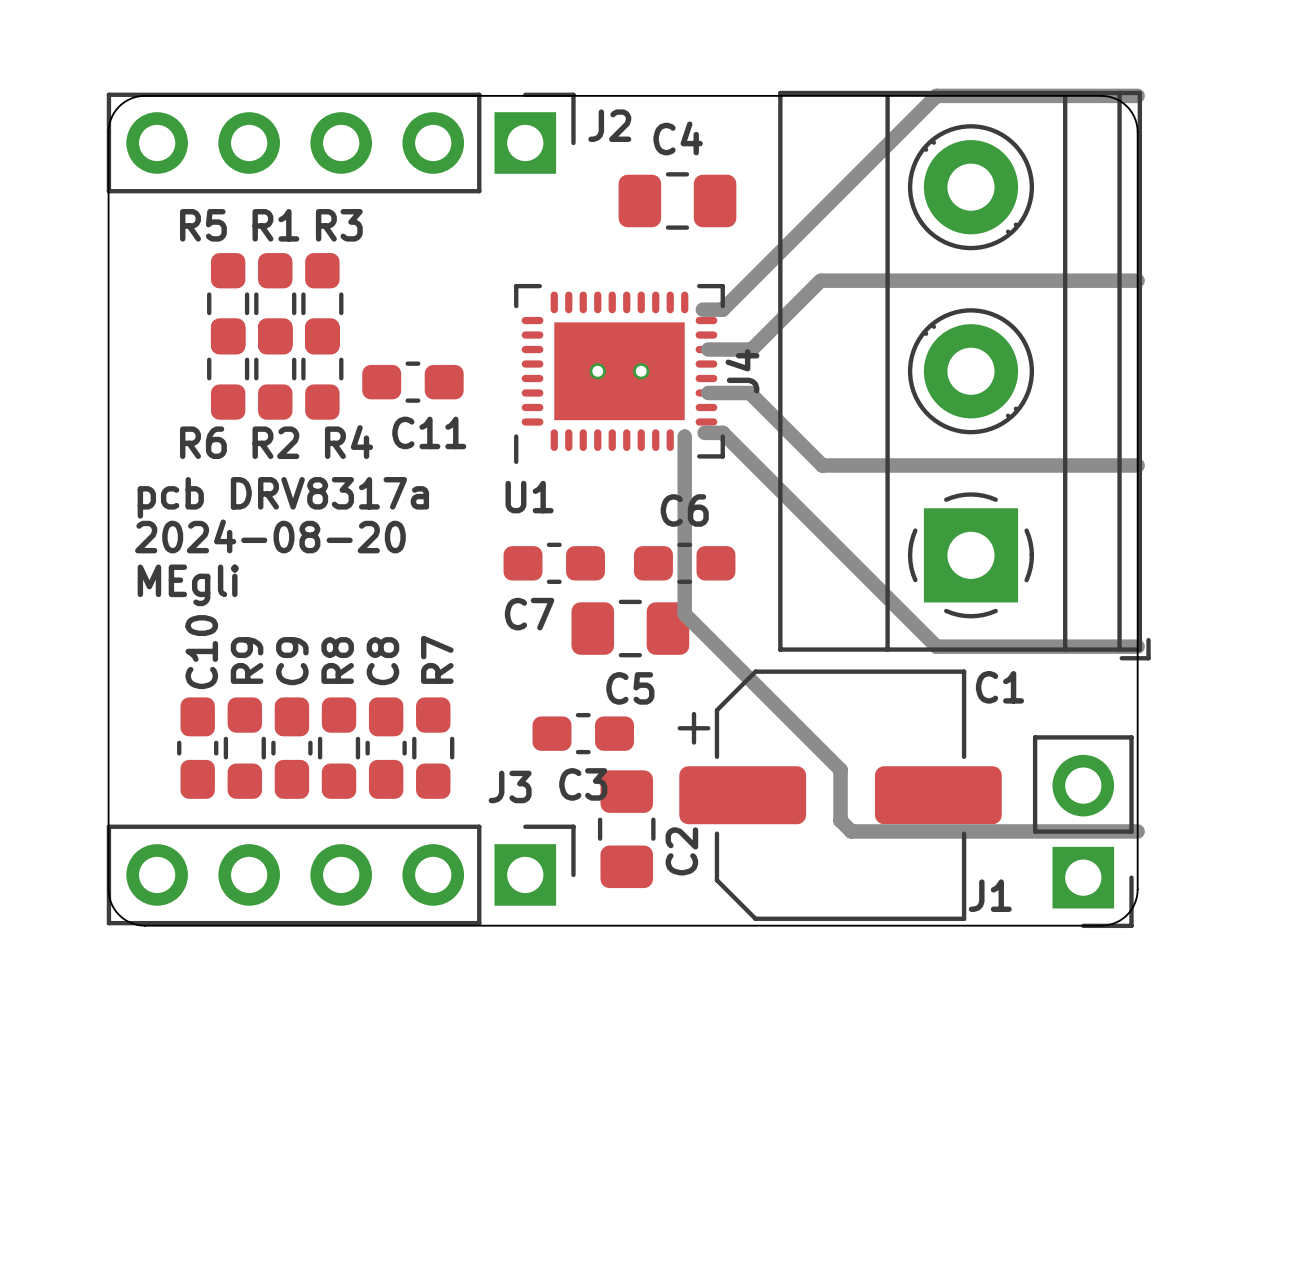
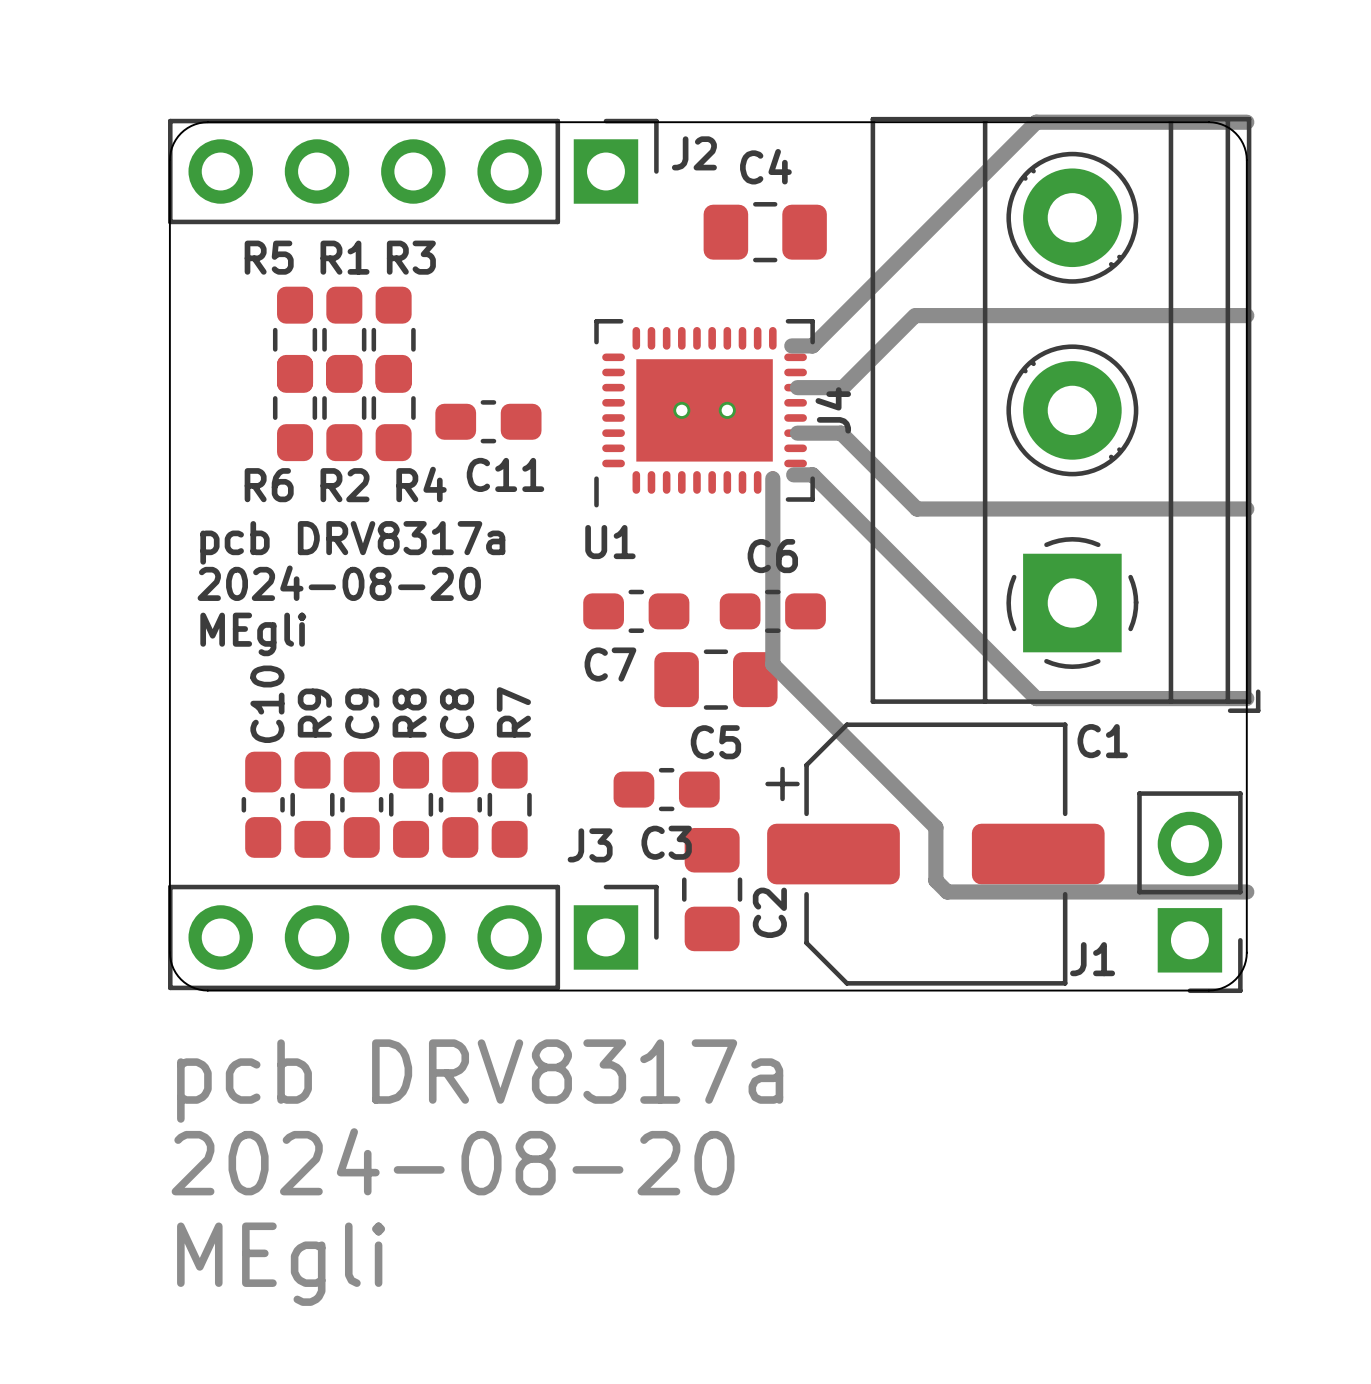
text: none -> pcb DRV8317a (480, 1081)
text: none -> 2024-08-20 (453, 1161)
text: none -> MEgli (281, 1264)

